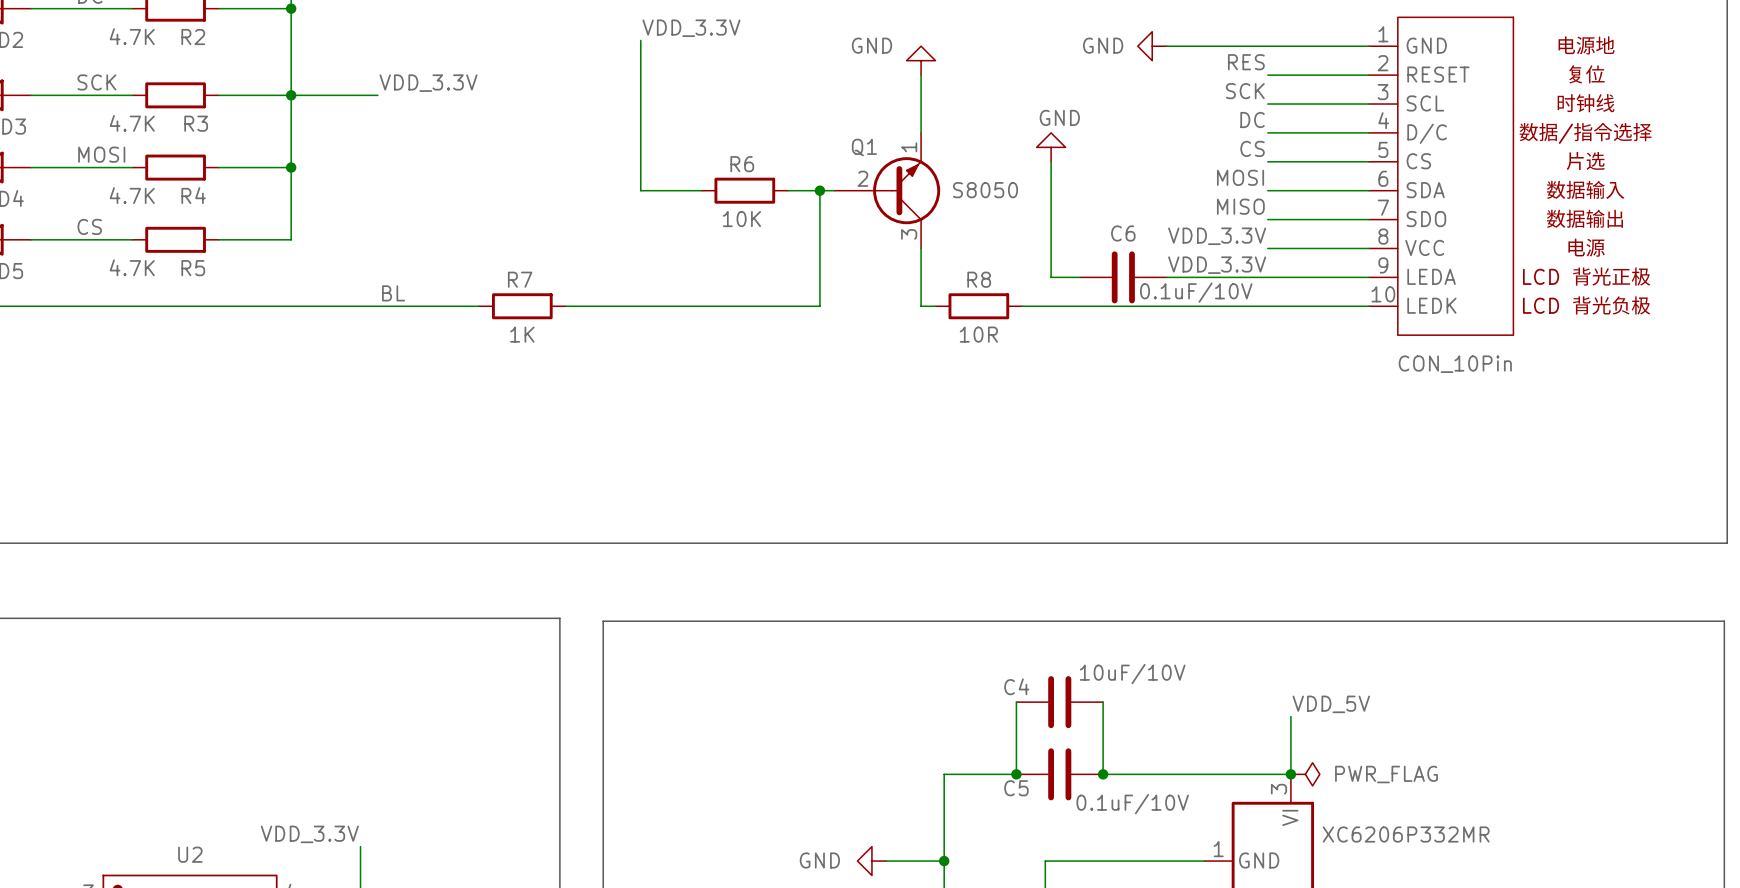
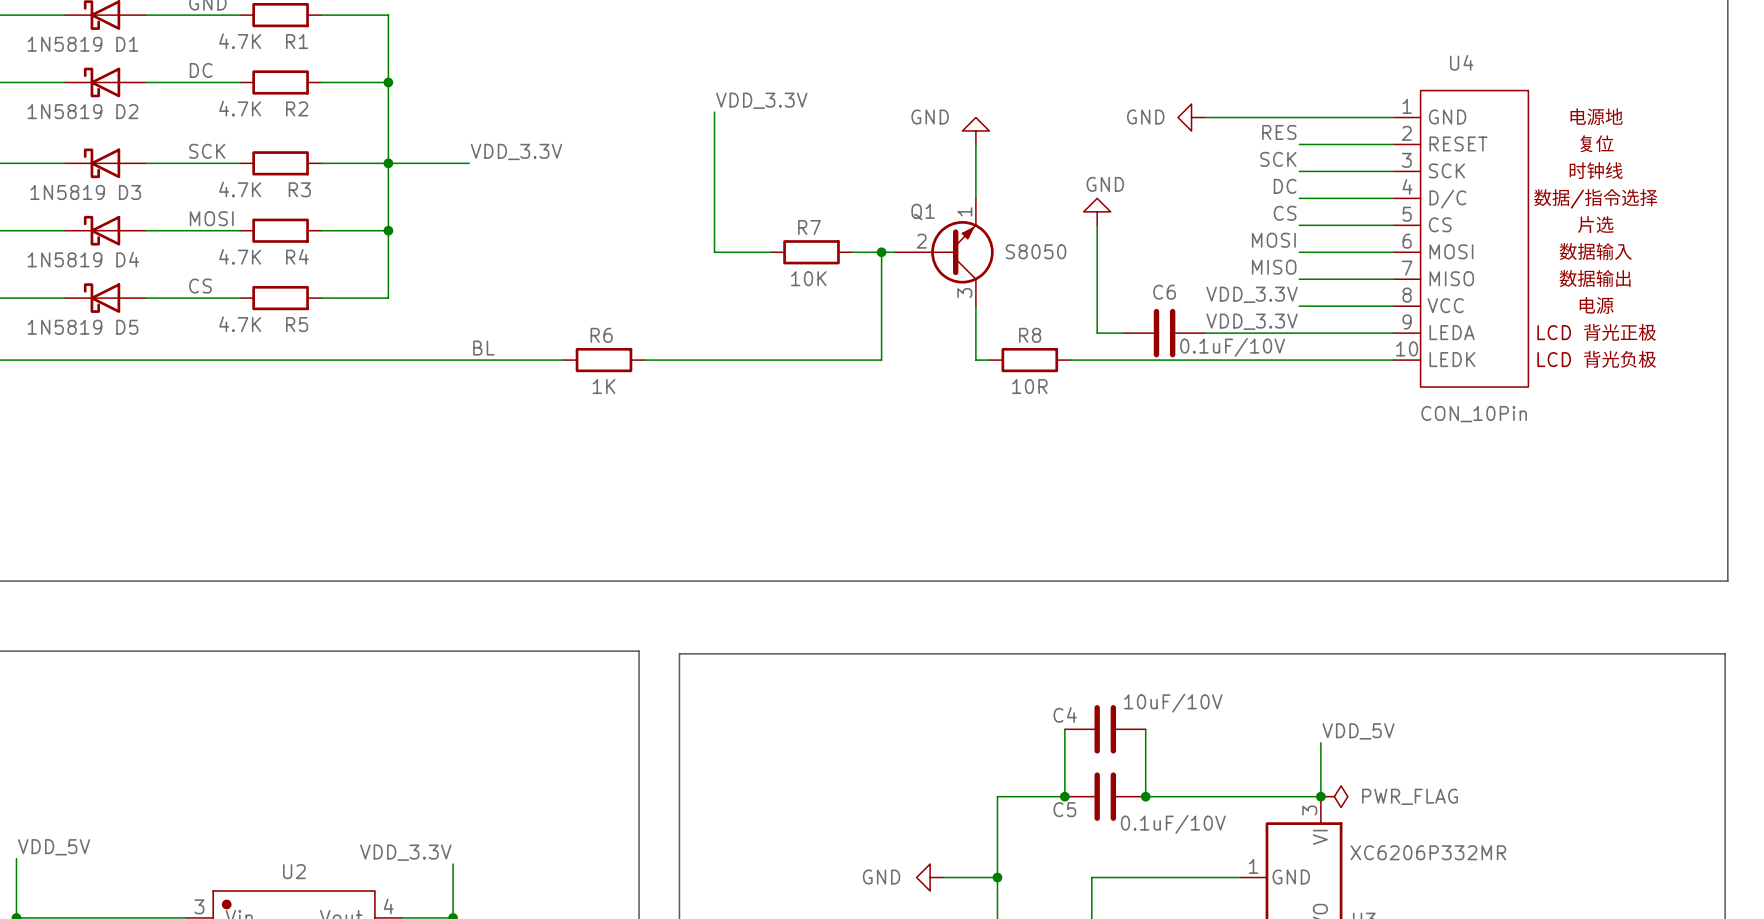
U4 pin name: SCL (1425, 103) -> SCK (1446, 170)
R6 name: R6 (742, 164) -> R7 (809, 227)
U4 pin name: SDA (1425, 190) -> MOSI (1451, 251)
U4 pin name: SDO (1426, 219) -> MISO (1451, 278)
R7 name: R7 (520, 279) -> R6 (601, 335)

